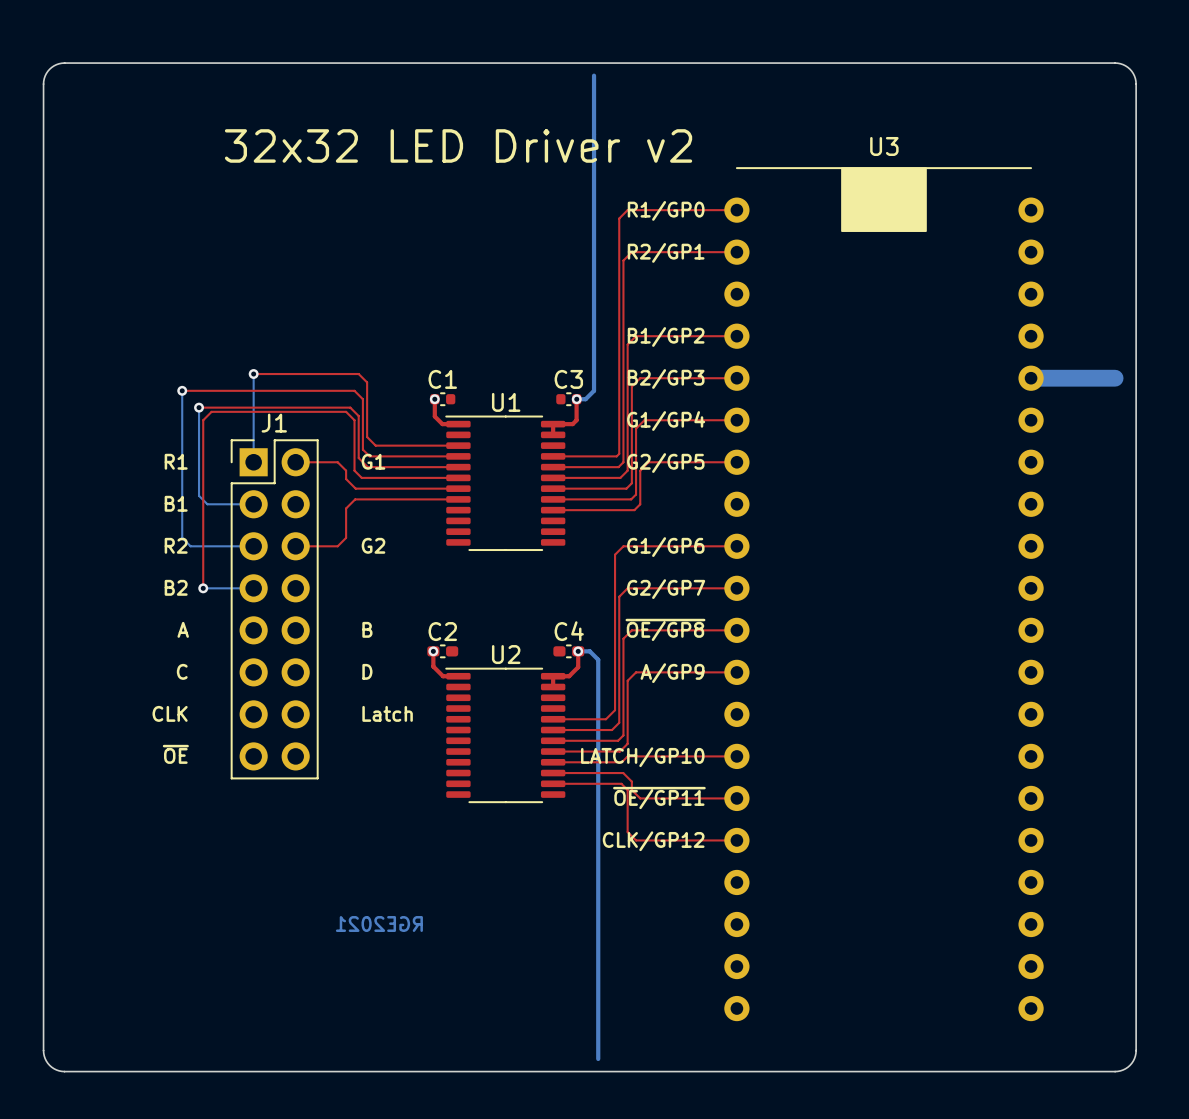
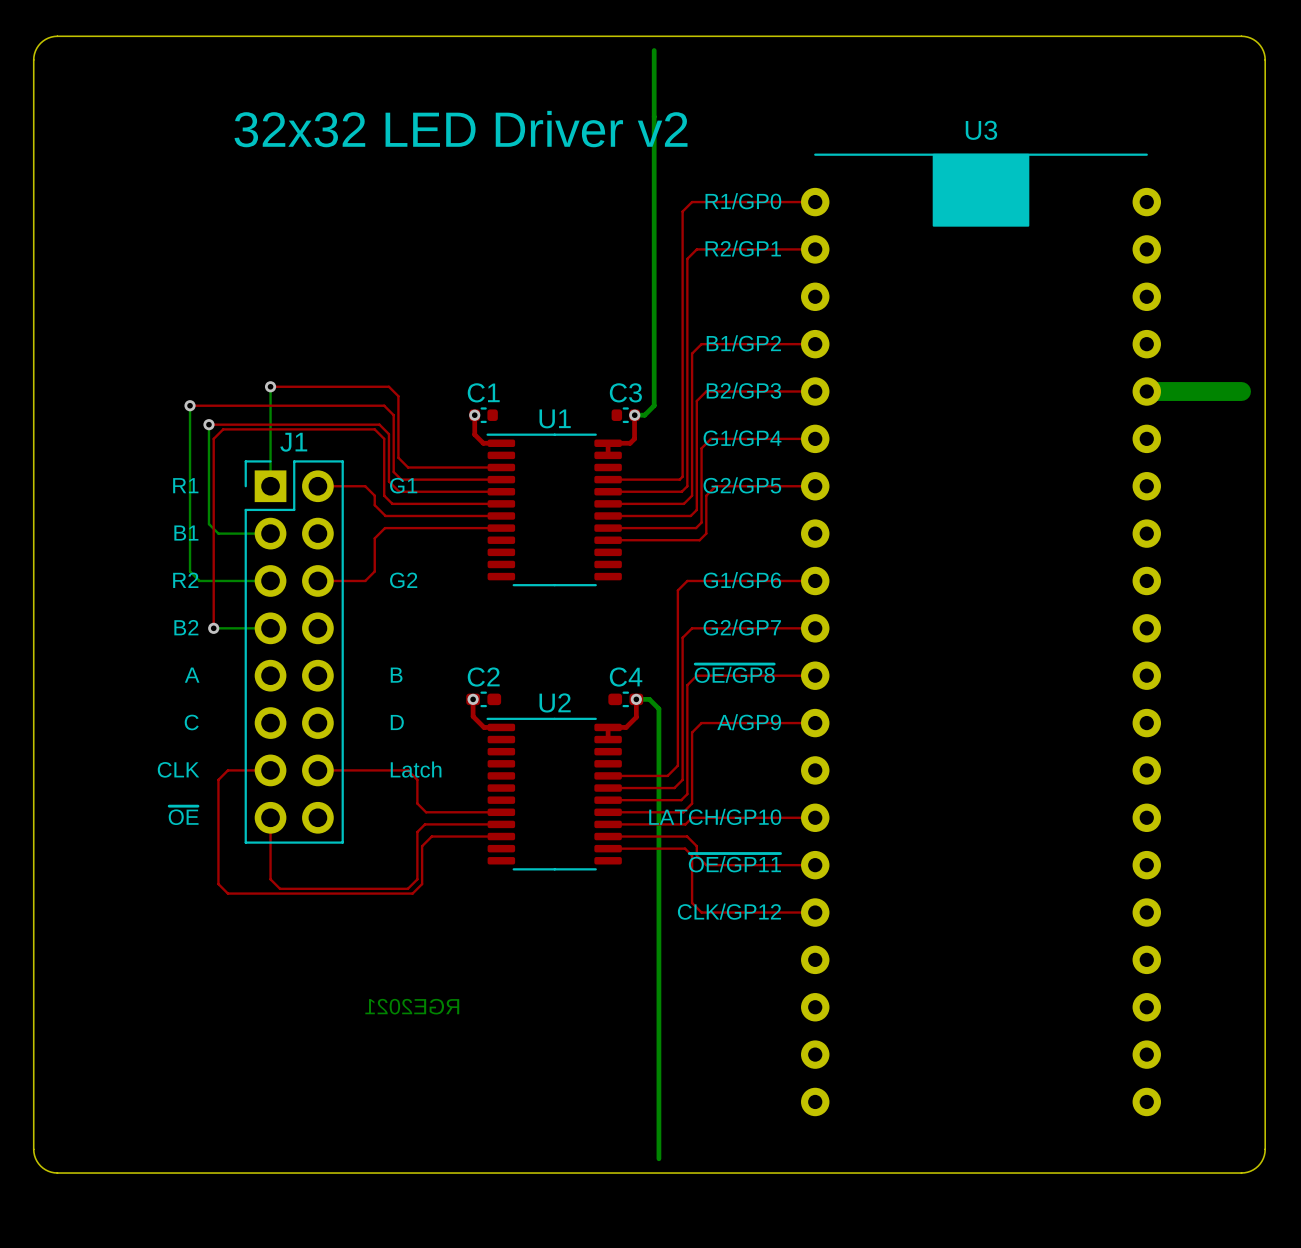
top track: none -> (270, 770) (227, 770) (218, 779) (218, 884) (227, 893) (412, 893) (422, 884) (422, 846) (431, 836) (501, 836)
top track: none -> (317, 770) (407, 770) (417, 779) (417, 803) (426, 812) (501, 812)
top track: none -> (270, 817) (270, 879) (280, 888) (407, 888) (417, 879) (417, 831) (424, 824) (501, 824)

